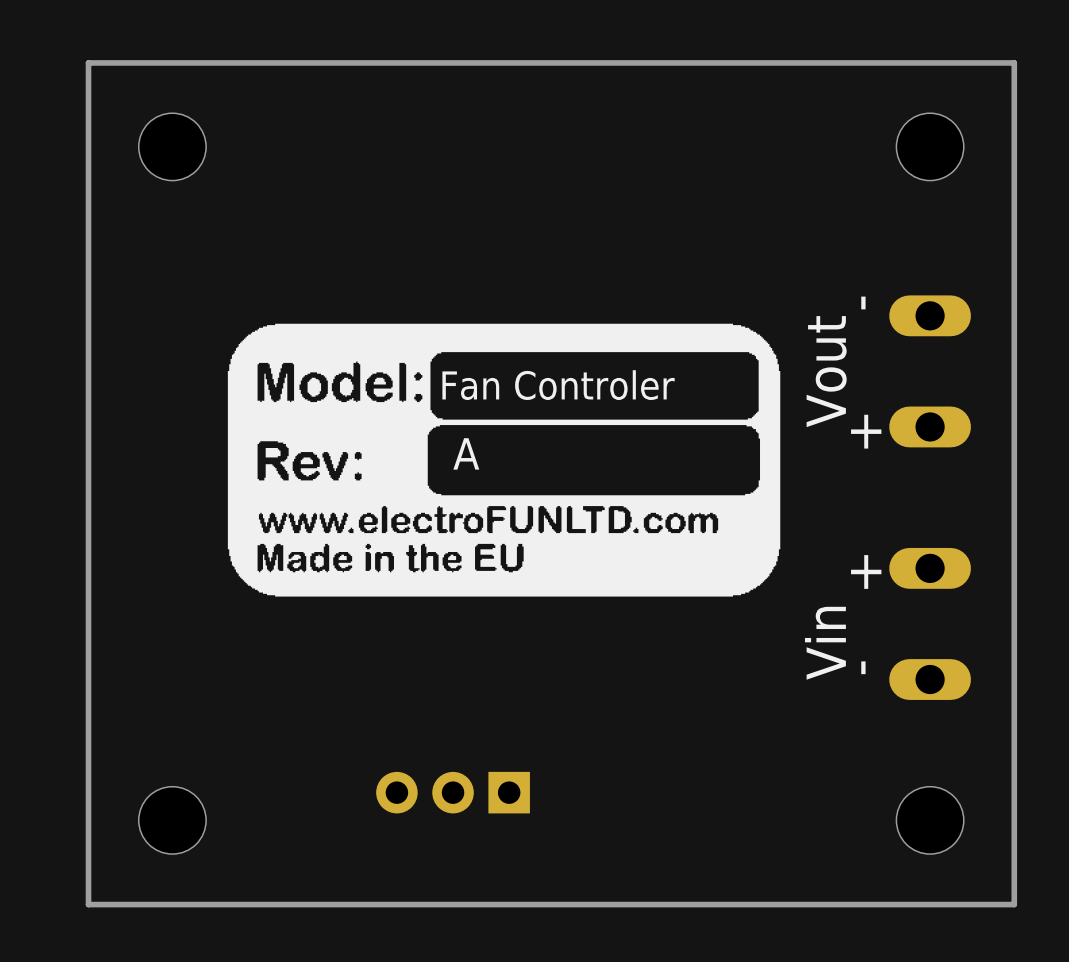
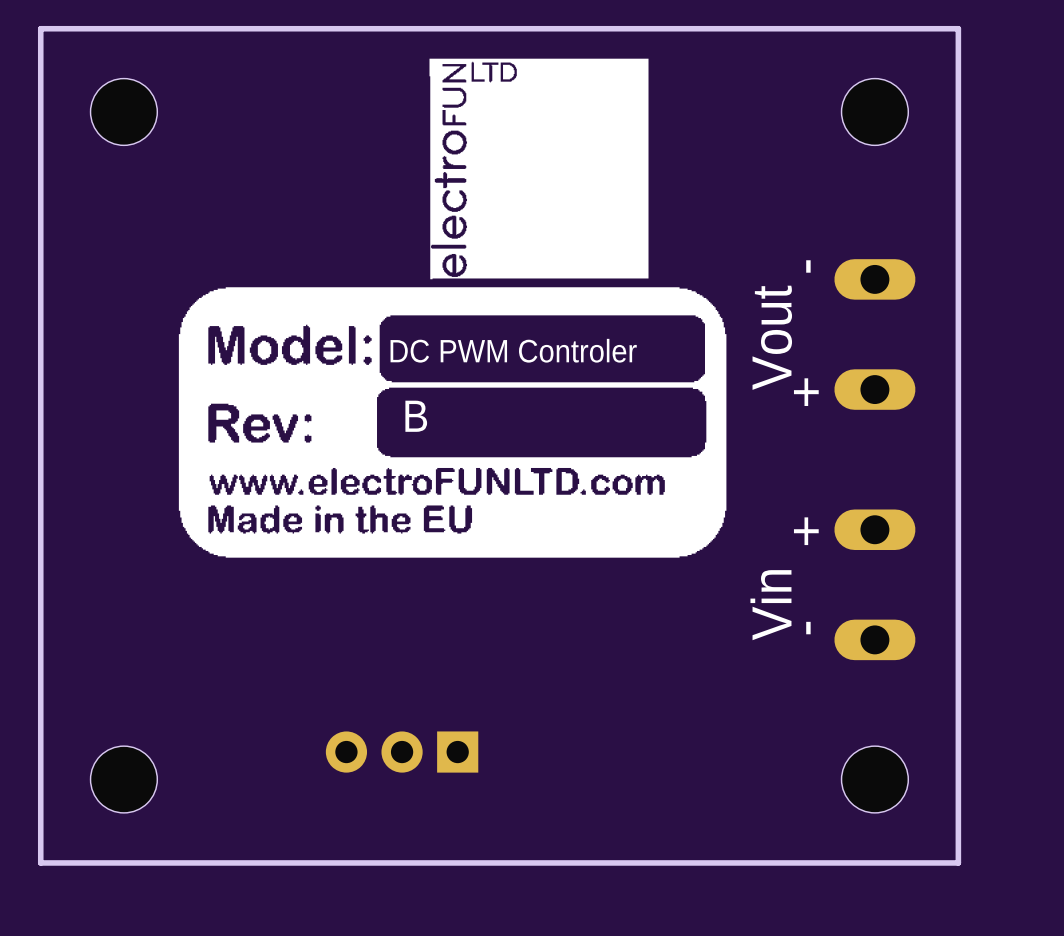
drawing: none -> [429, 58, 649, 280]
text: Fan Controler (558, 385) -> DC PWM Controler (513, 350)
text: A (466, 453) -> B (416, 416)

